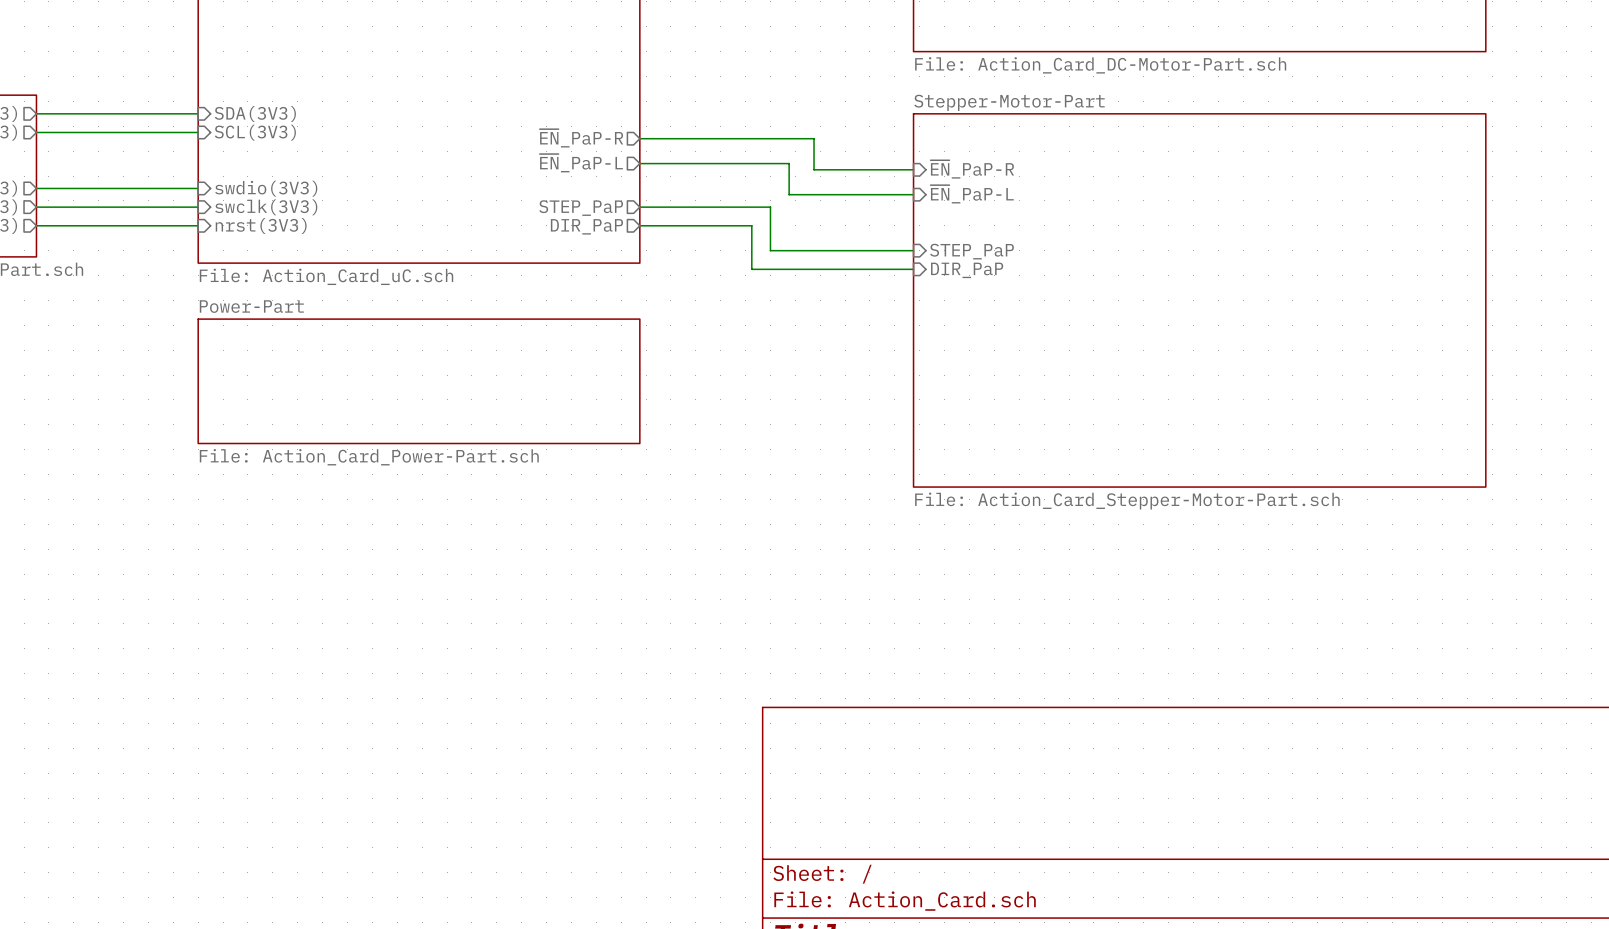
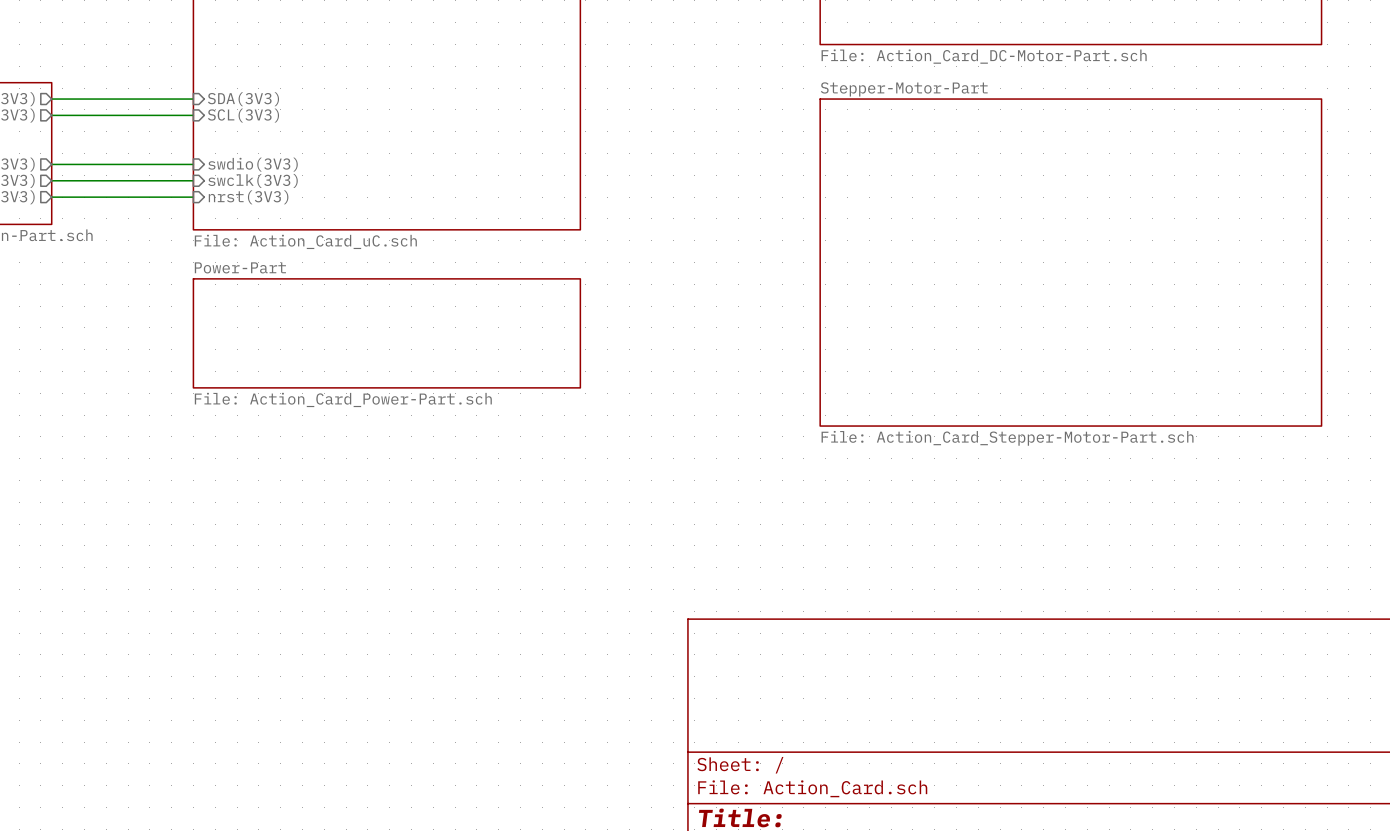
sheet pin: ~{EN}_PaP-R (581, 138) -> none
wire: (639, 138) (814, 138) (814, 169) (913, 169) -> none
sheet pin: ~{EN}_PaP-L (581, 163) -> none
wire: (639, 163) (789, 163) (789, 194) (913, 194) -> none
sheet pin: ~{EN}_PaP-R (972, 169) -> none
sheet pin: ~{EN}_PaP-L (972, 194) -> none
wire: (639, 207) (770, 207) (770, 250) (913, 250) -> none
sheet pin: STEP_PaP (581, 208) -> none
wire: (639, 225) (751, 225) (751, 269) (913, 269) -> none
sheet pin: DIR_PaP (586, 226) -> none
sheet pin: STEP_PaP (972, 251) -> none
sheet pin: DIR_PaP (967, 270) -> none

